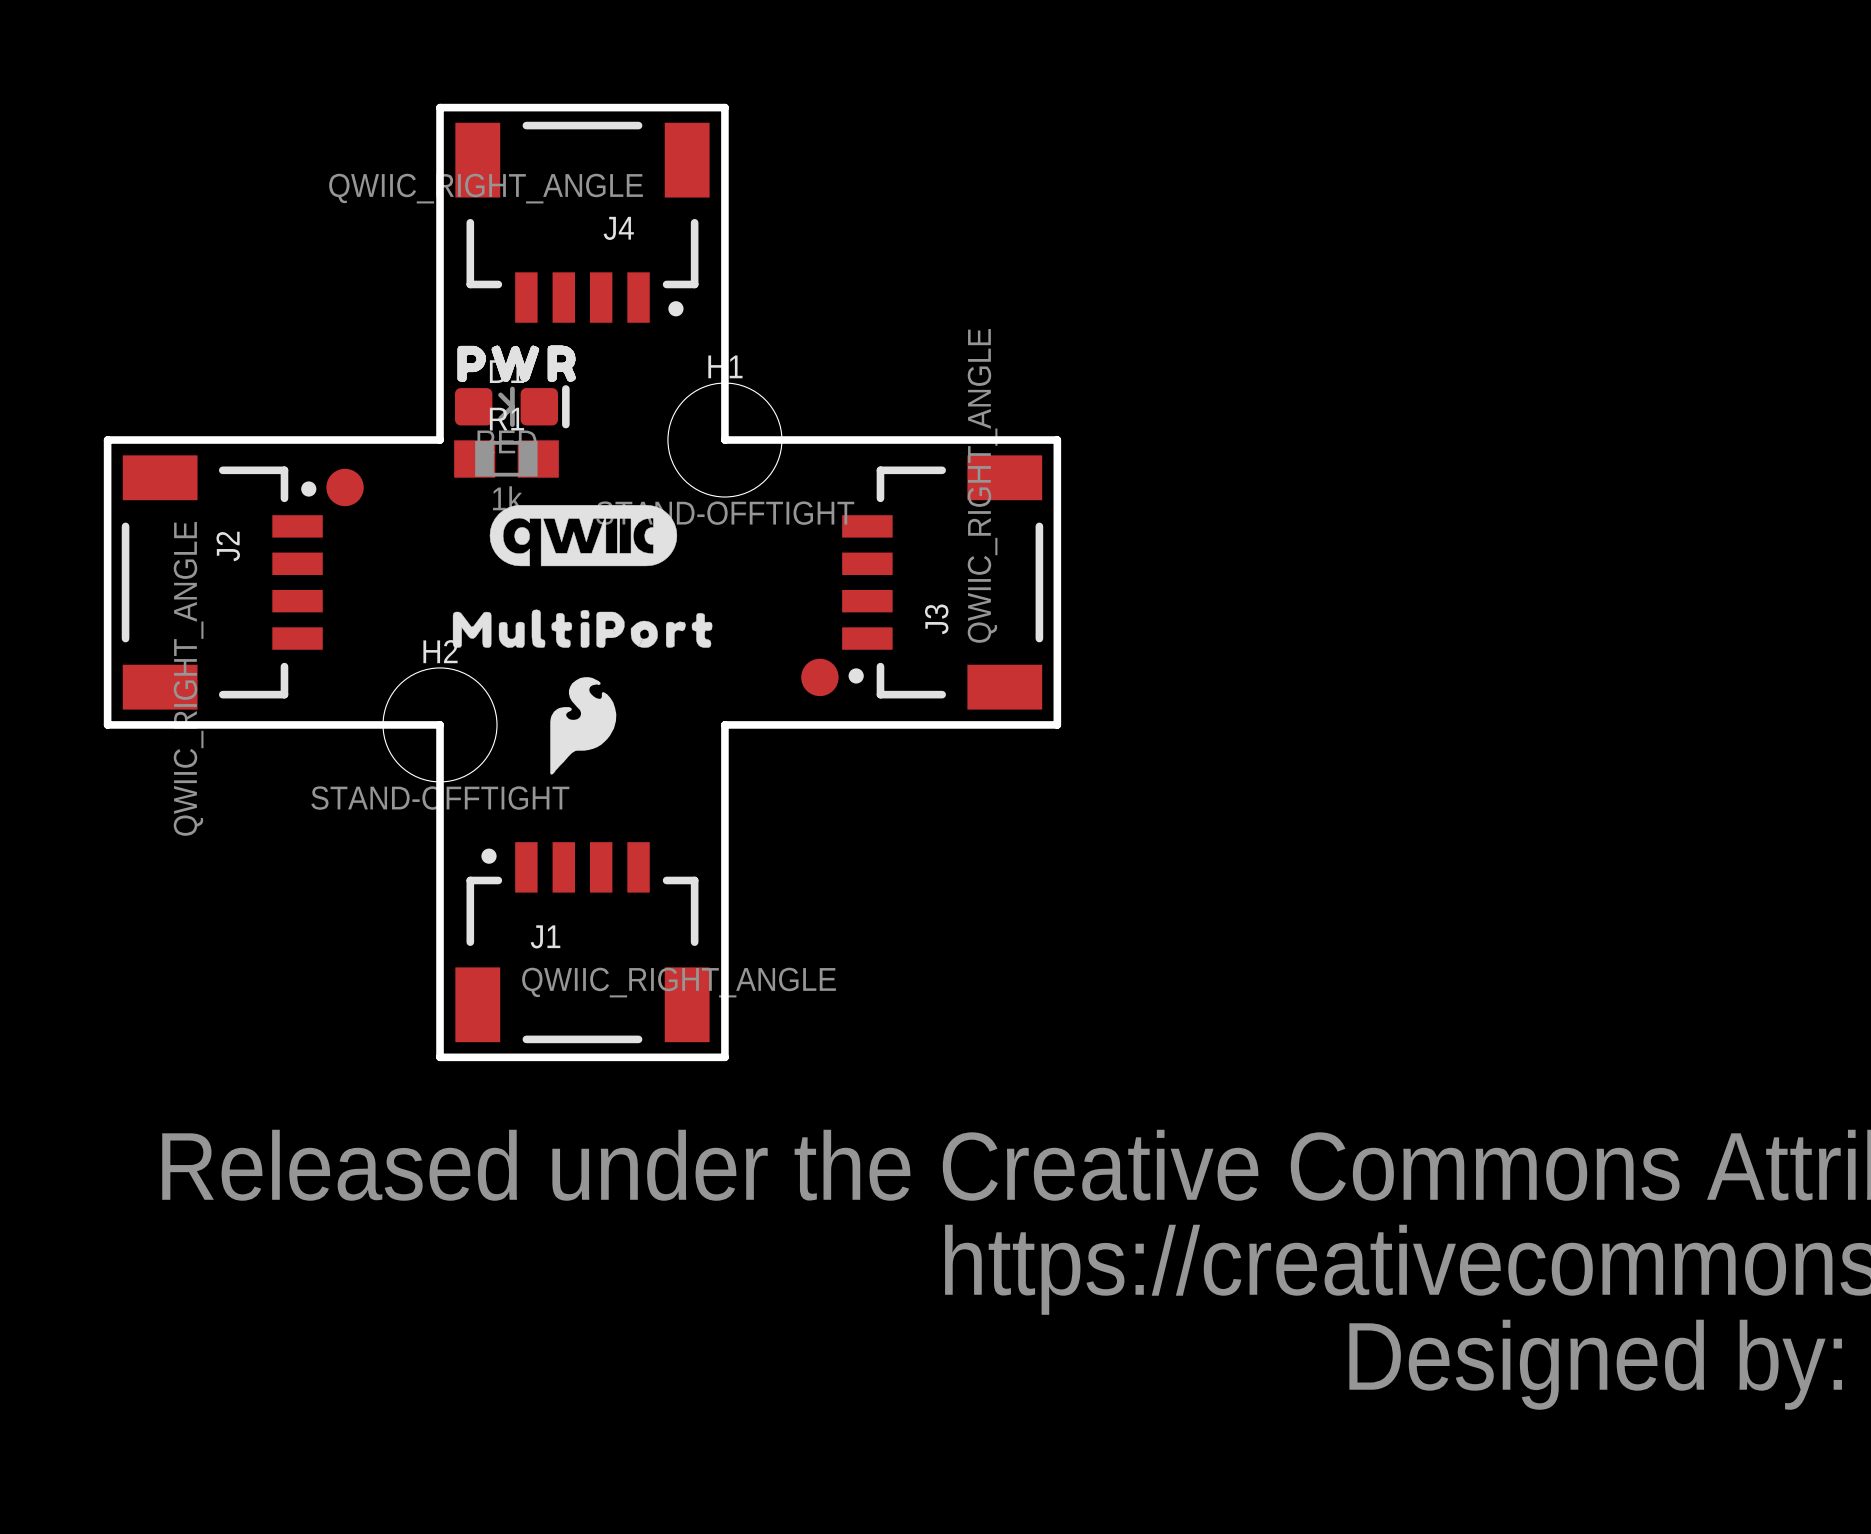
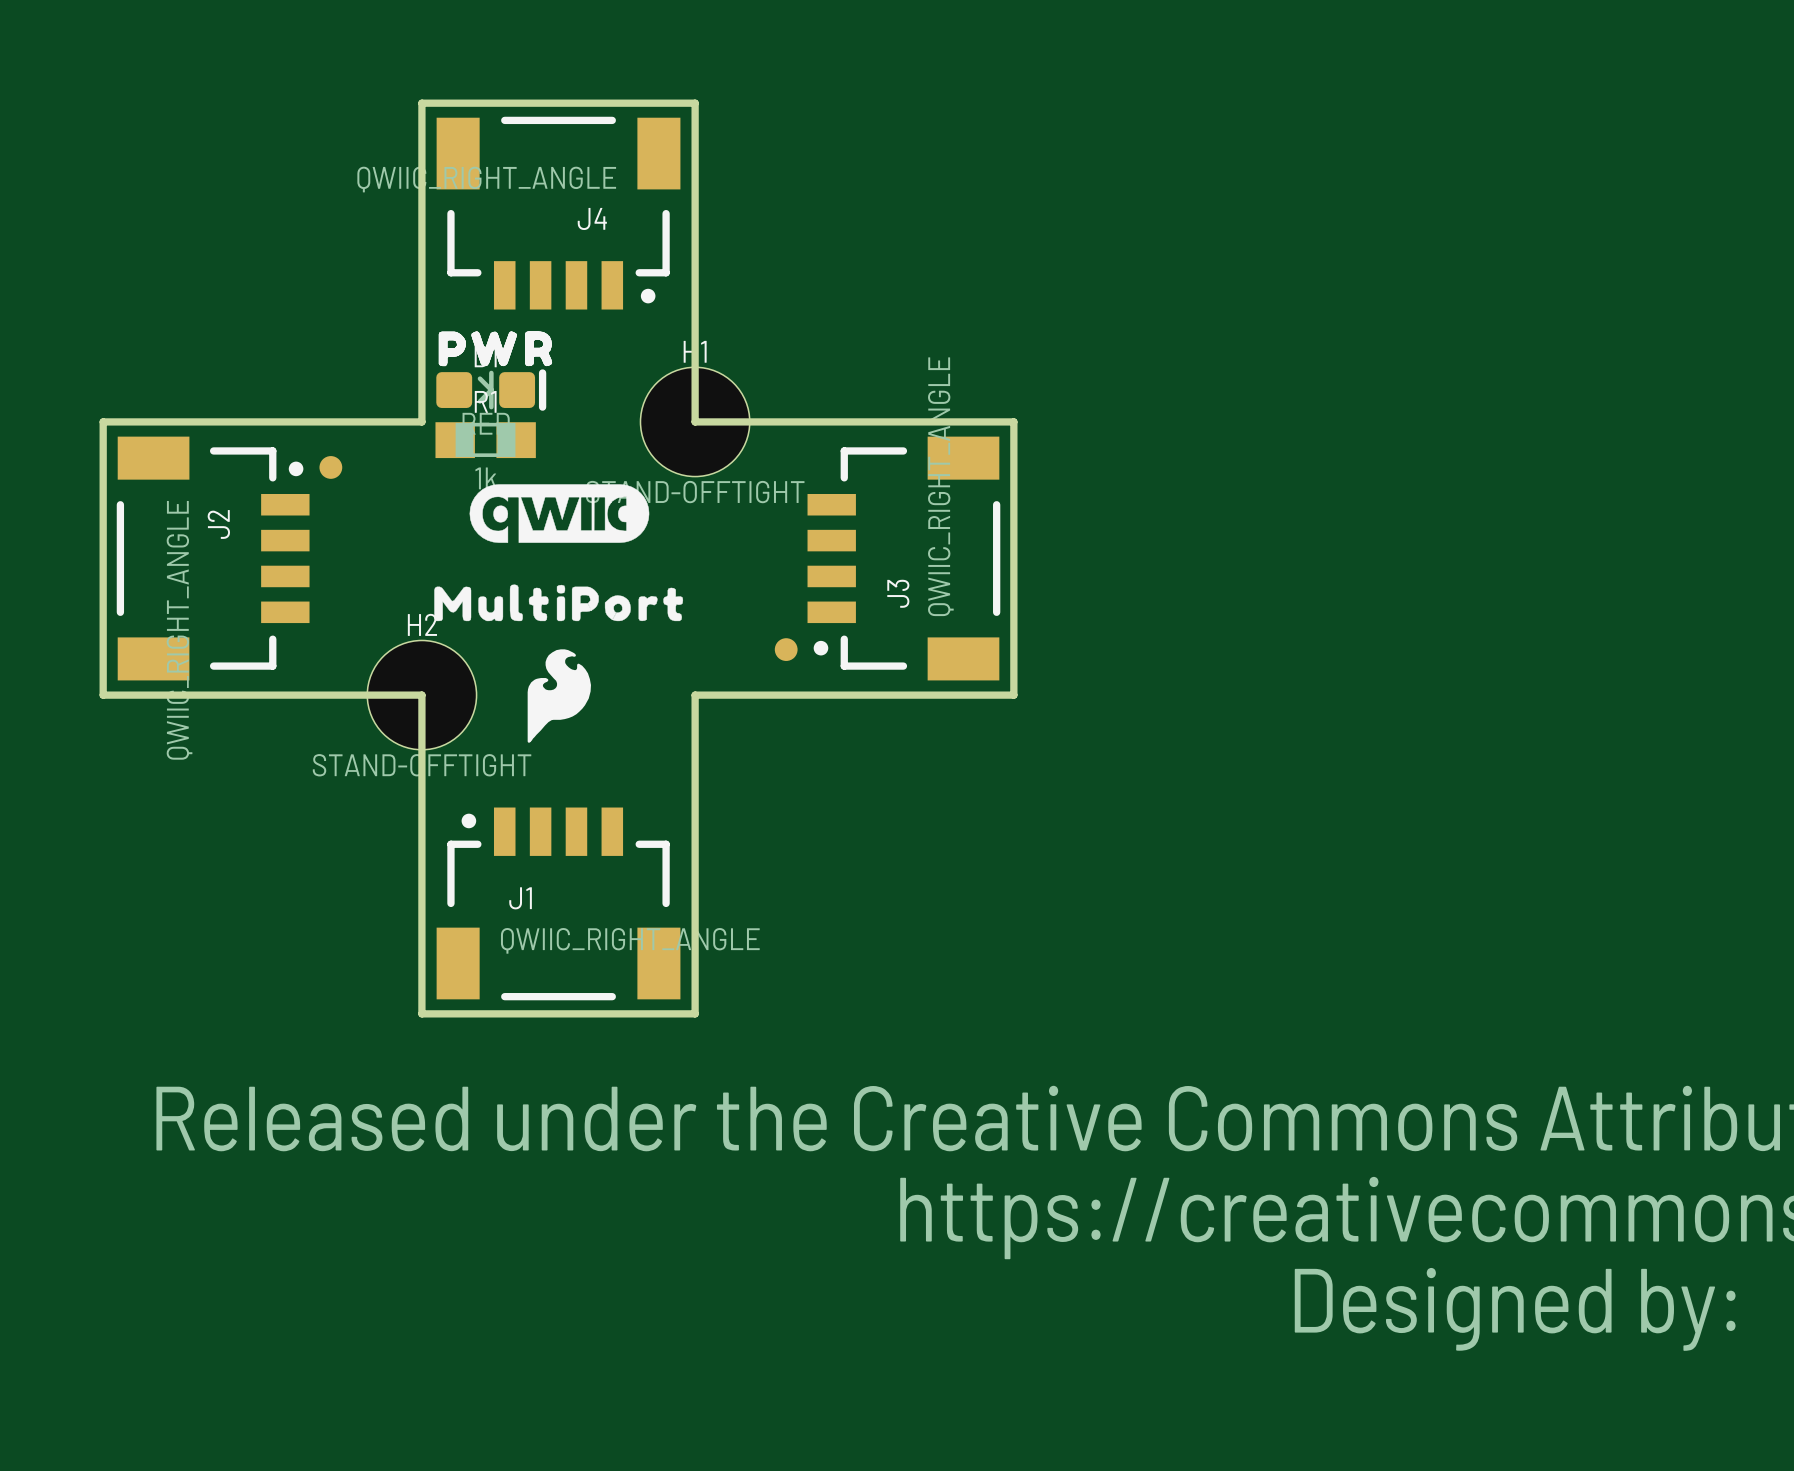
part footprint: [326, 468, 364, 507] -> [319, 456, 343, 479]
part footprint: [801, 658, 839, 697] -> [774, 638, 798, 661]

